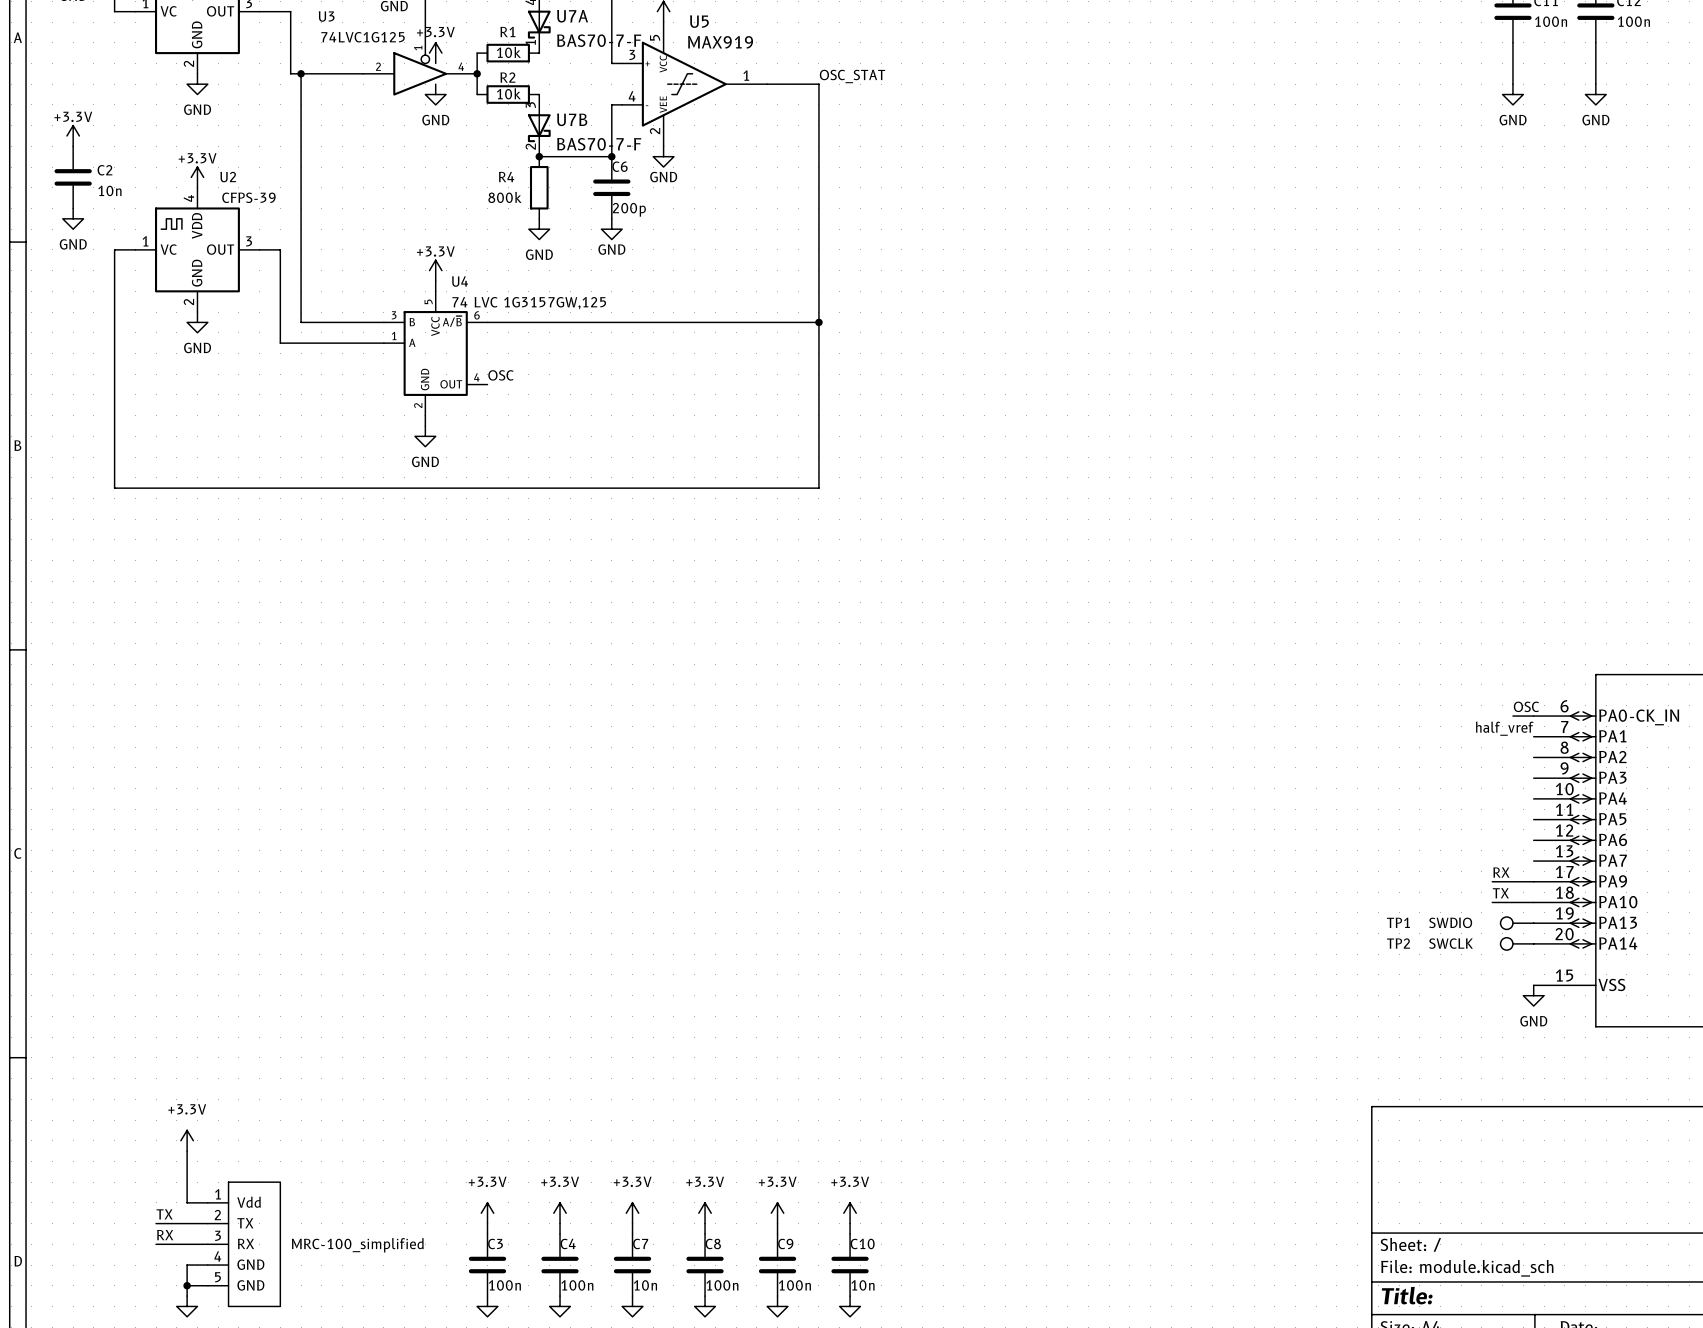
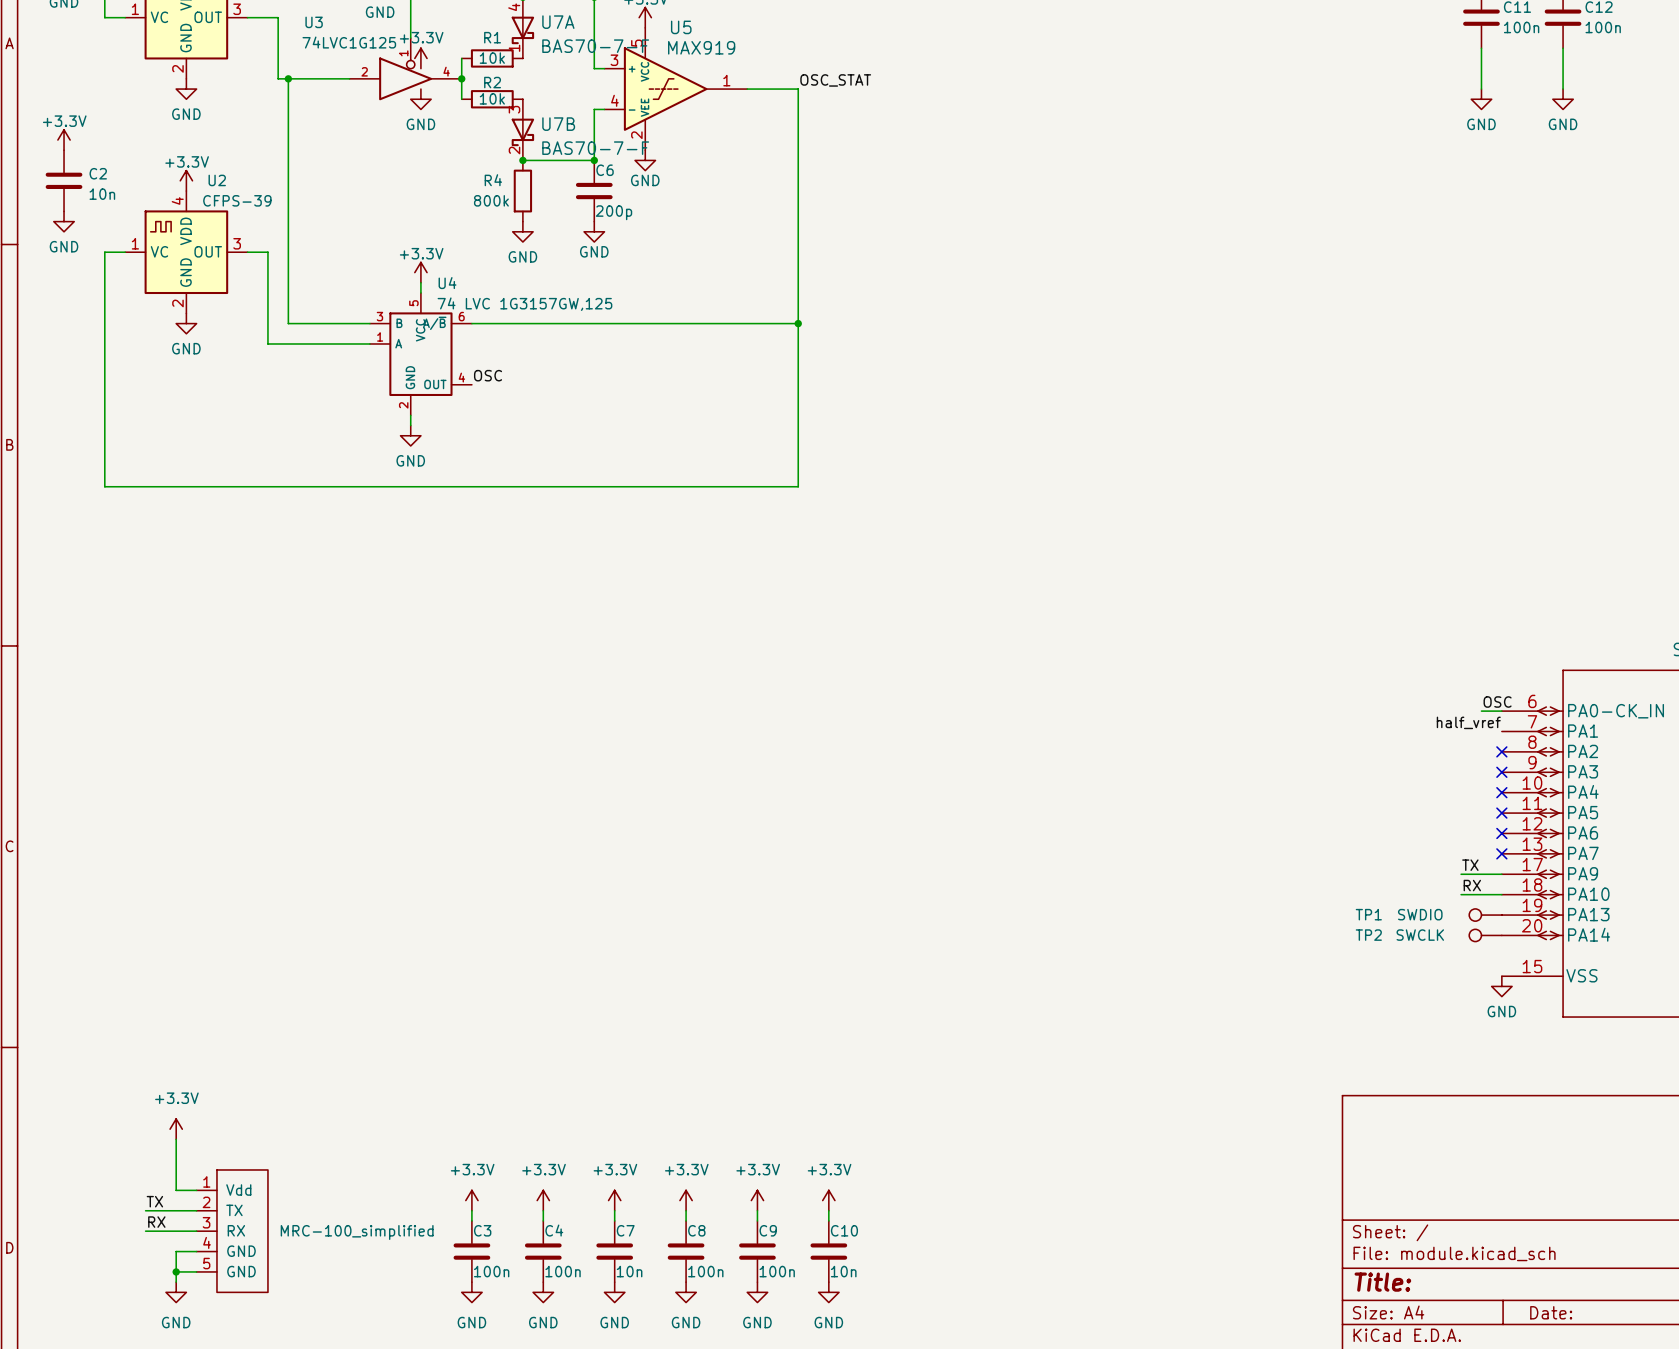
no-connect mark: none -> (1501, 751)
no-connect mark: none -> (1501, 772)
no-connect mark: none -> (1501, 792)
no-connect mark: none -> (1501, 813)
no-connect mark: none -> (1501, 833)
no-connect mark: none -> (1501, 853)
label: RX (1501, 872) -> TX (1470, 865)
label: TX (1500, 893) -> RX (1472, 885)

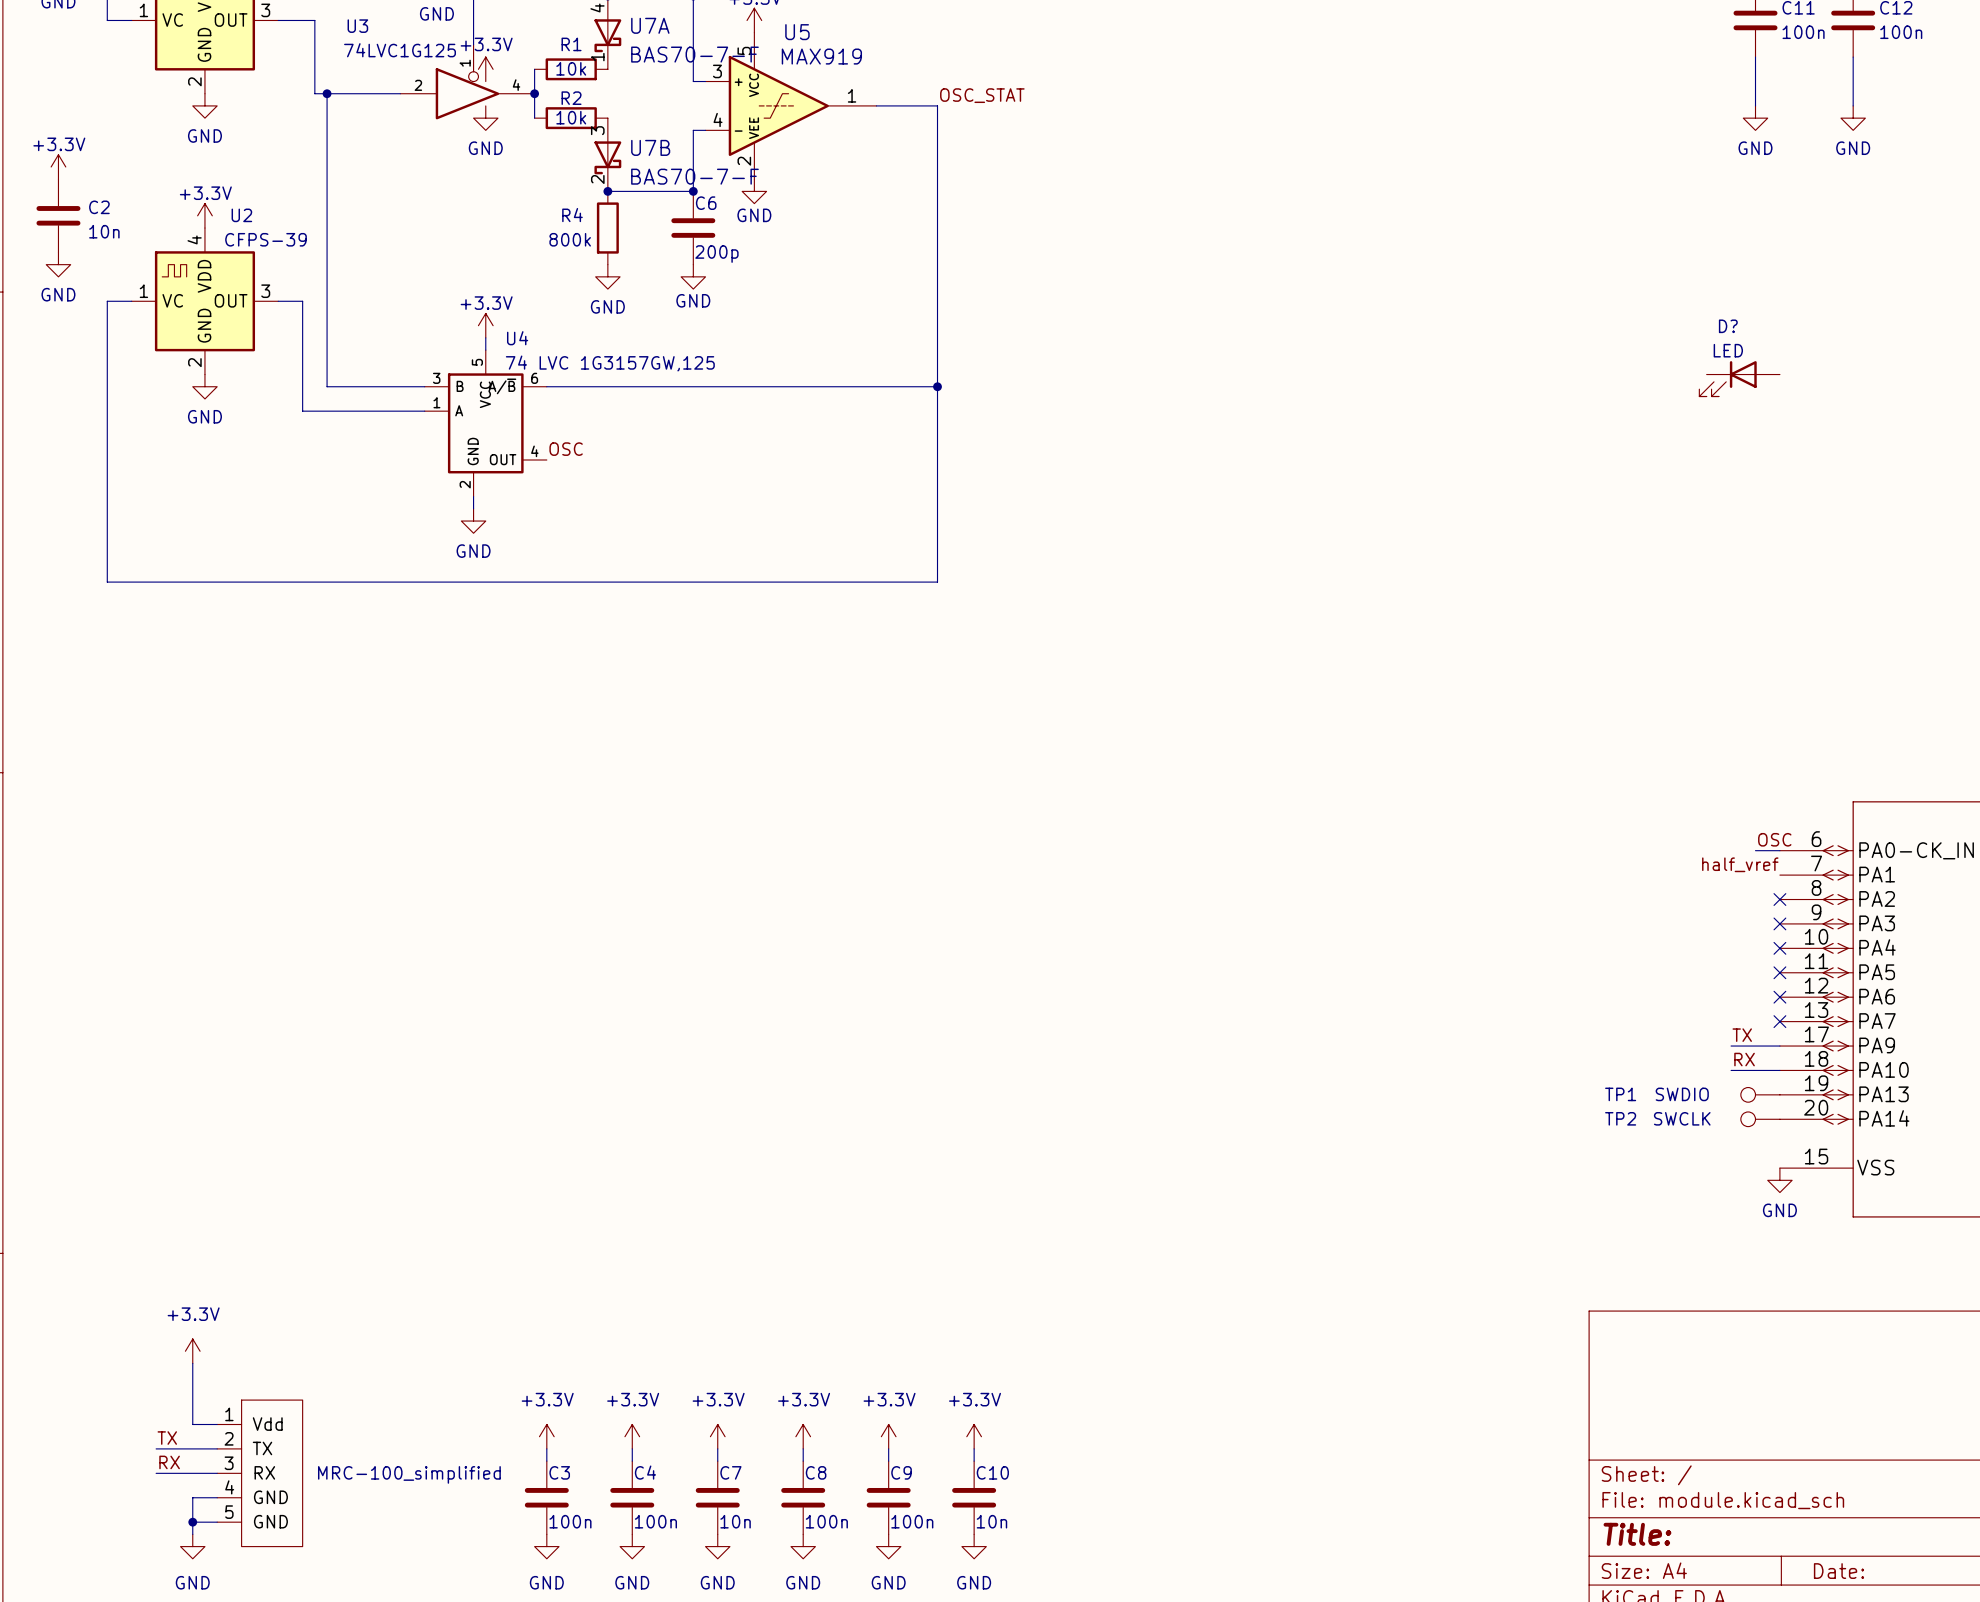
D?: none -> LED (1739, 378)

